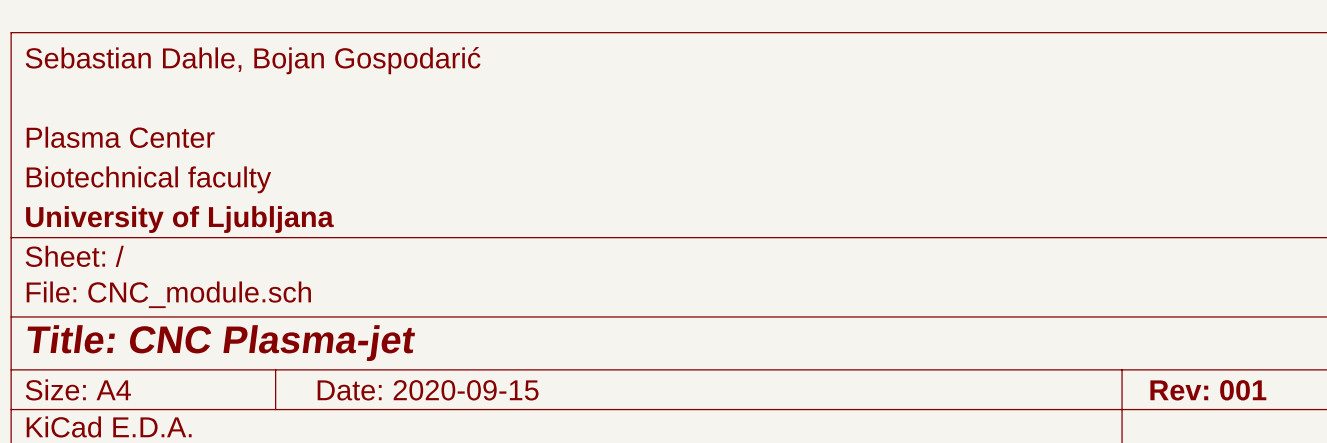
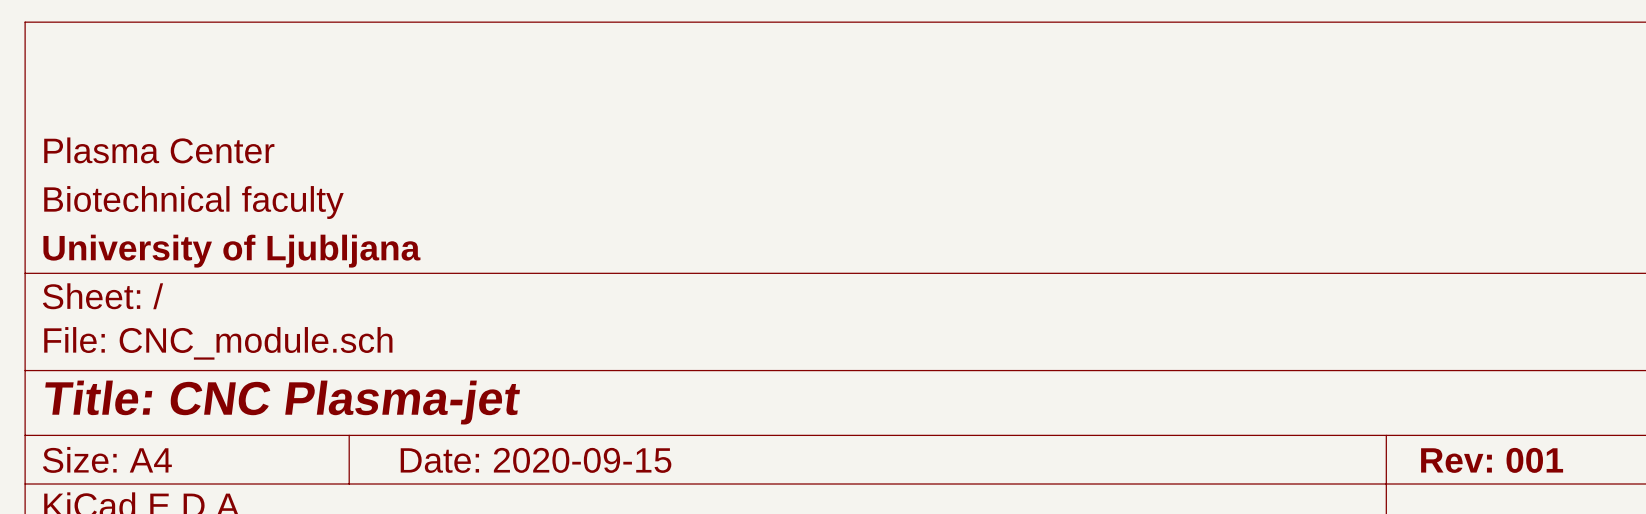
title block: Sebastian Dahle, Bojan Gospodarić (253, 60) -> none

